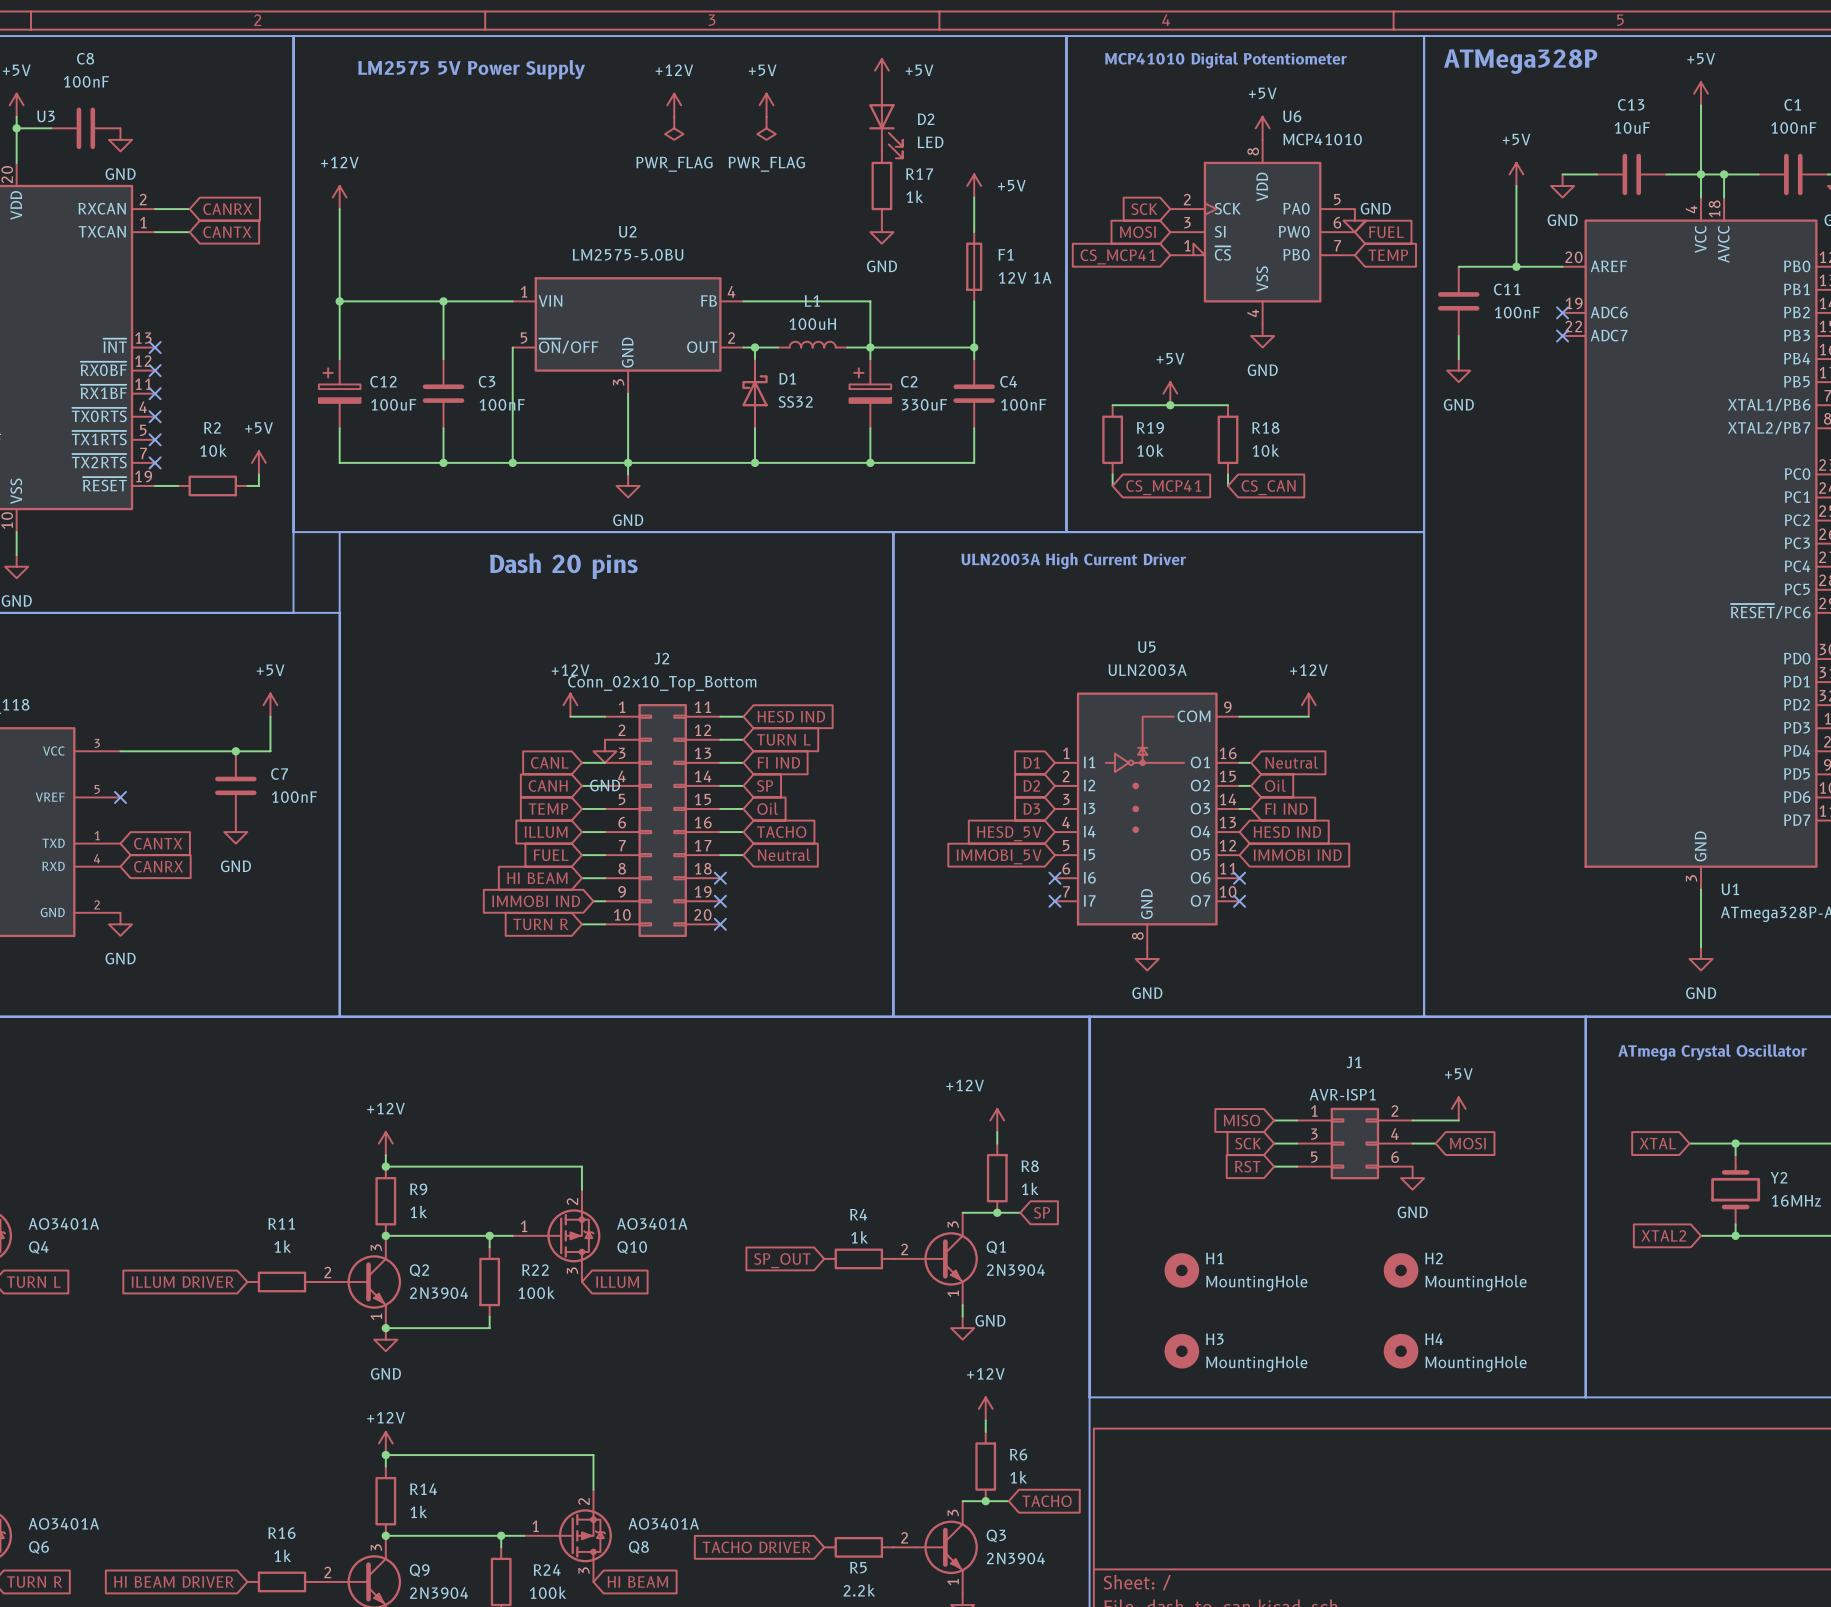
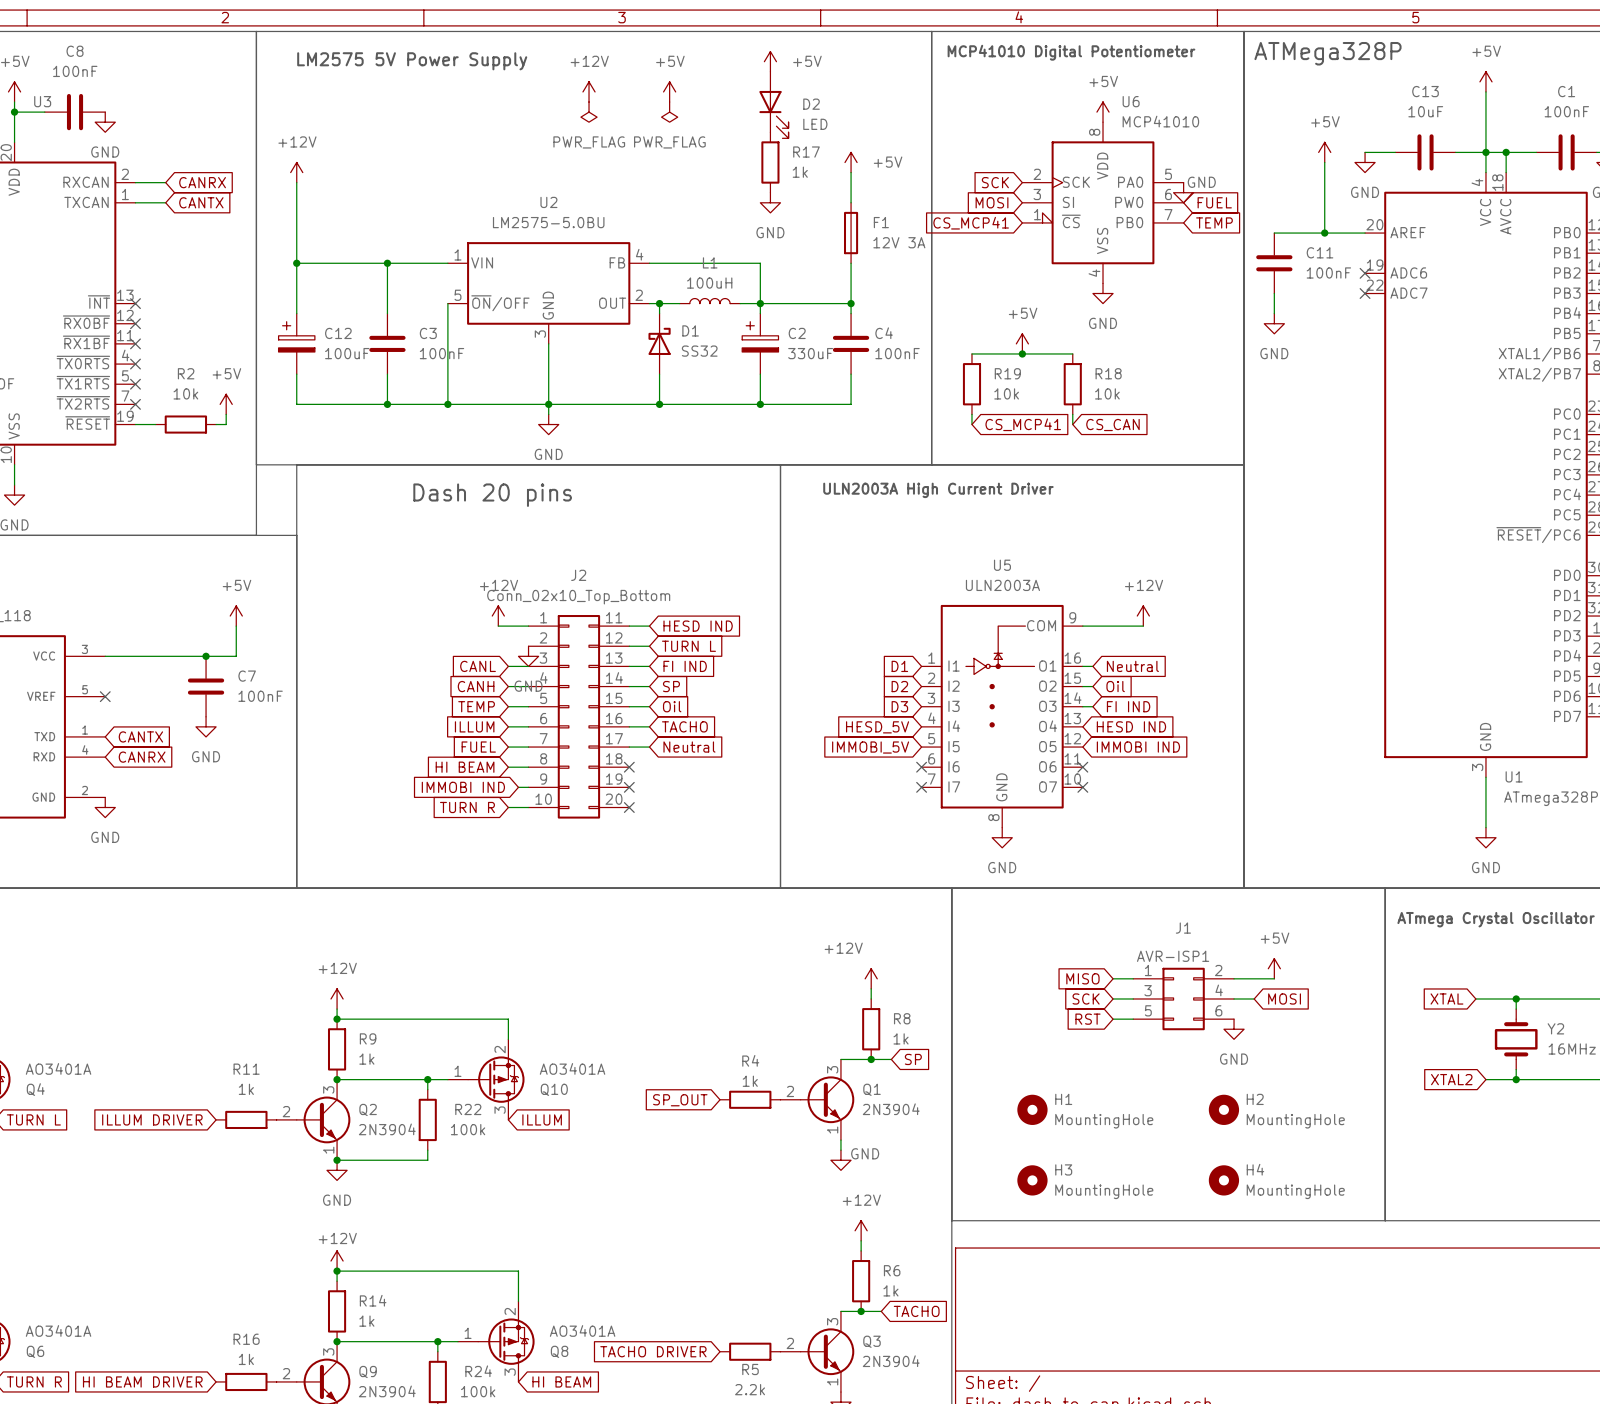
F1 value: 12V 1A (1025, 277) -> 12V 3A (899, 242)

